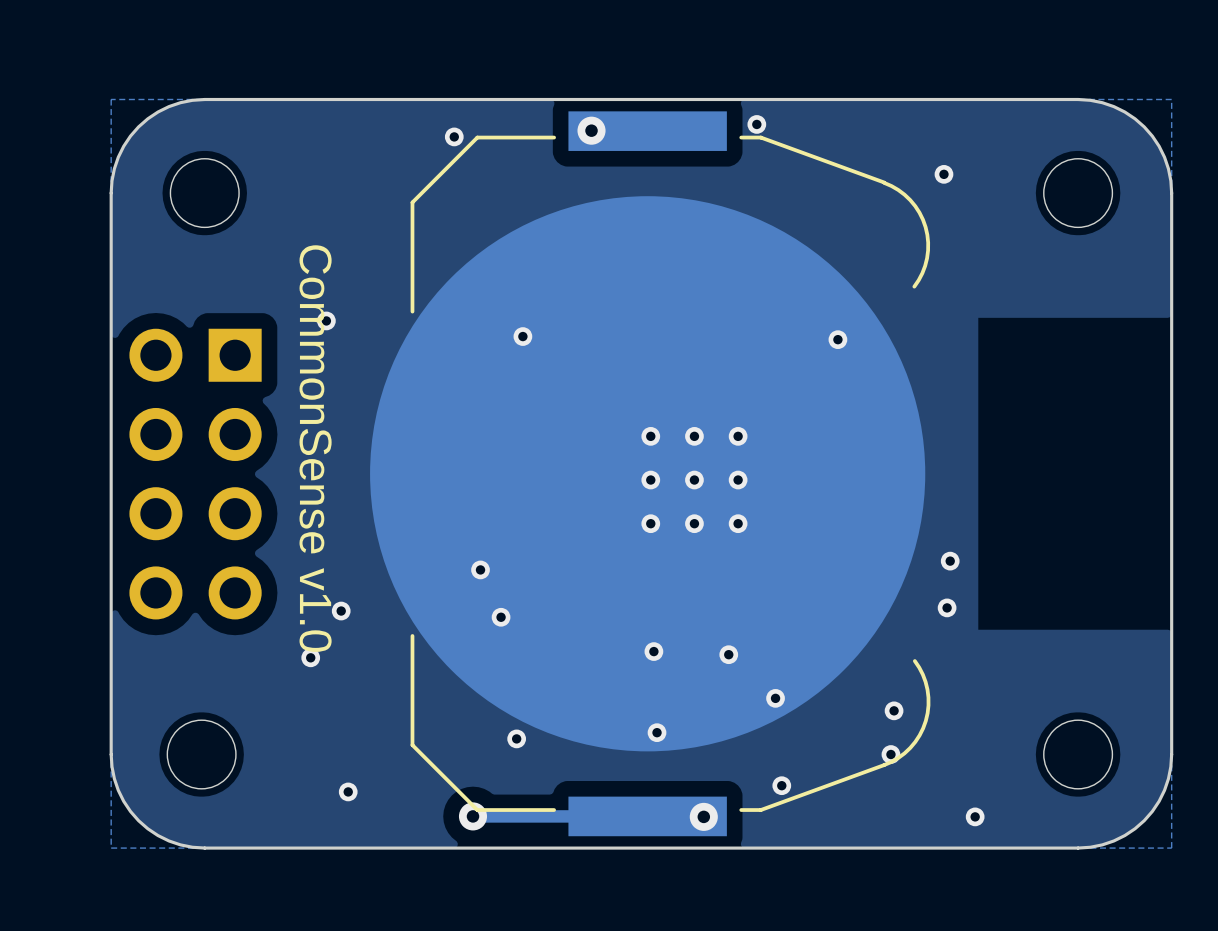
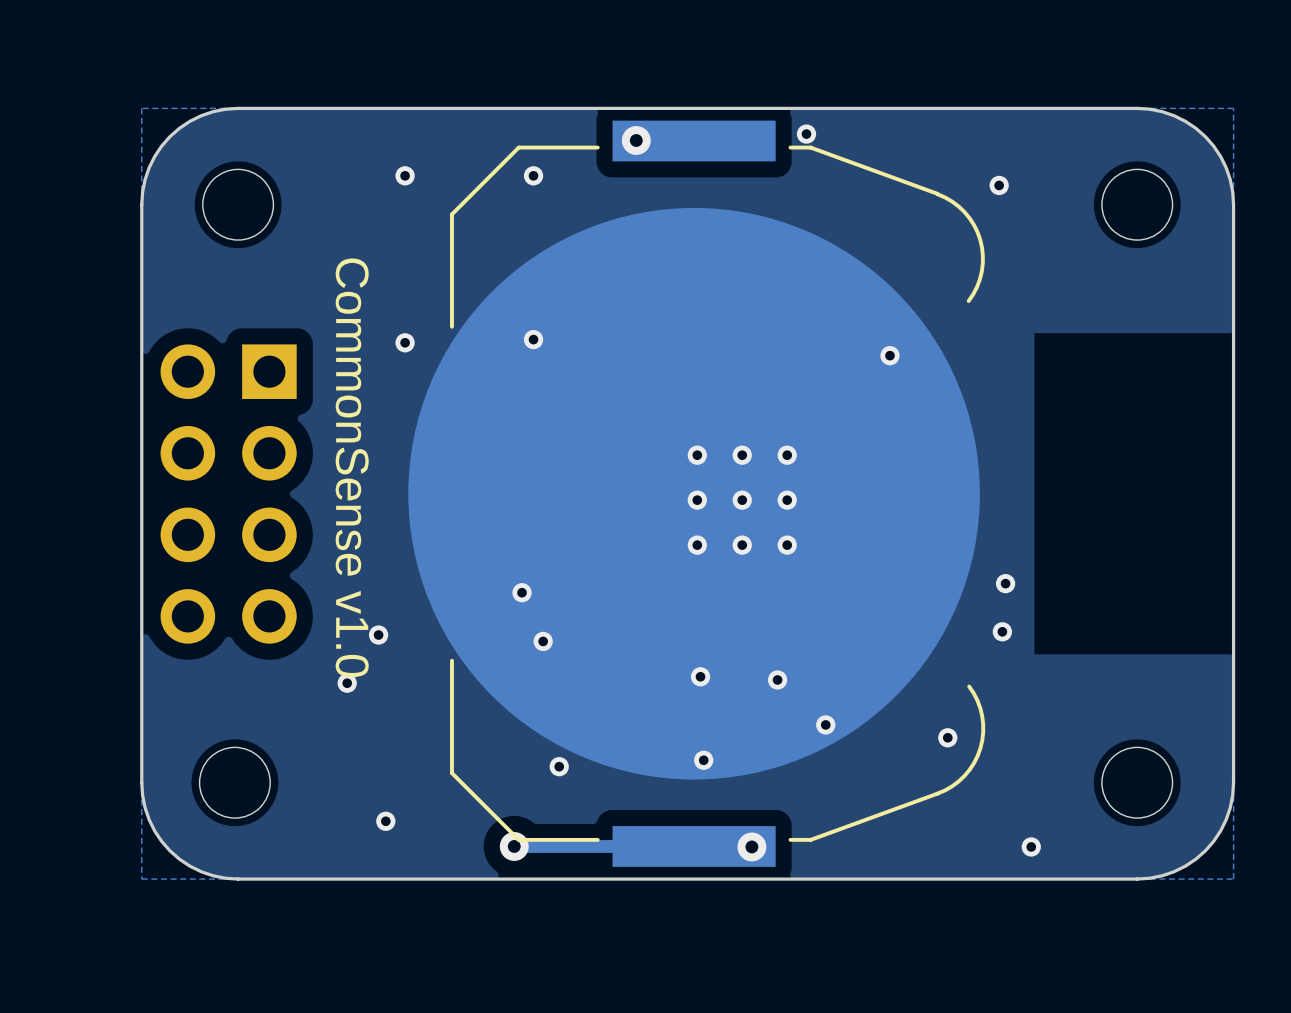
via: (454, 136) -> none
via: none -> (405, 175)
via: none -> (533, 175)
via position: (326, 320) -> (405, 342)
via position: (522, 336) -> (533, 339)
via: (890, 754) -> none
via: (781, 785) -> none

